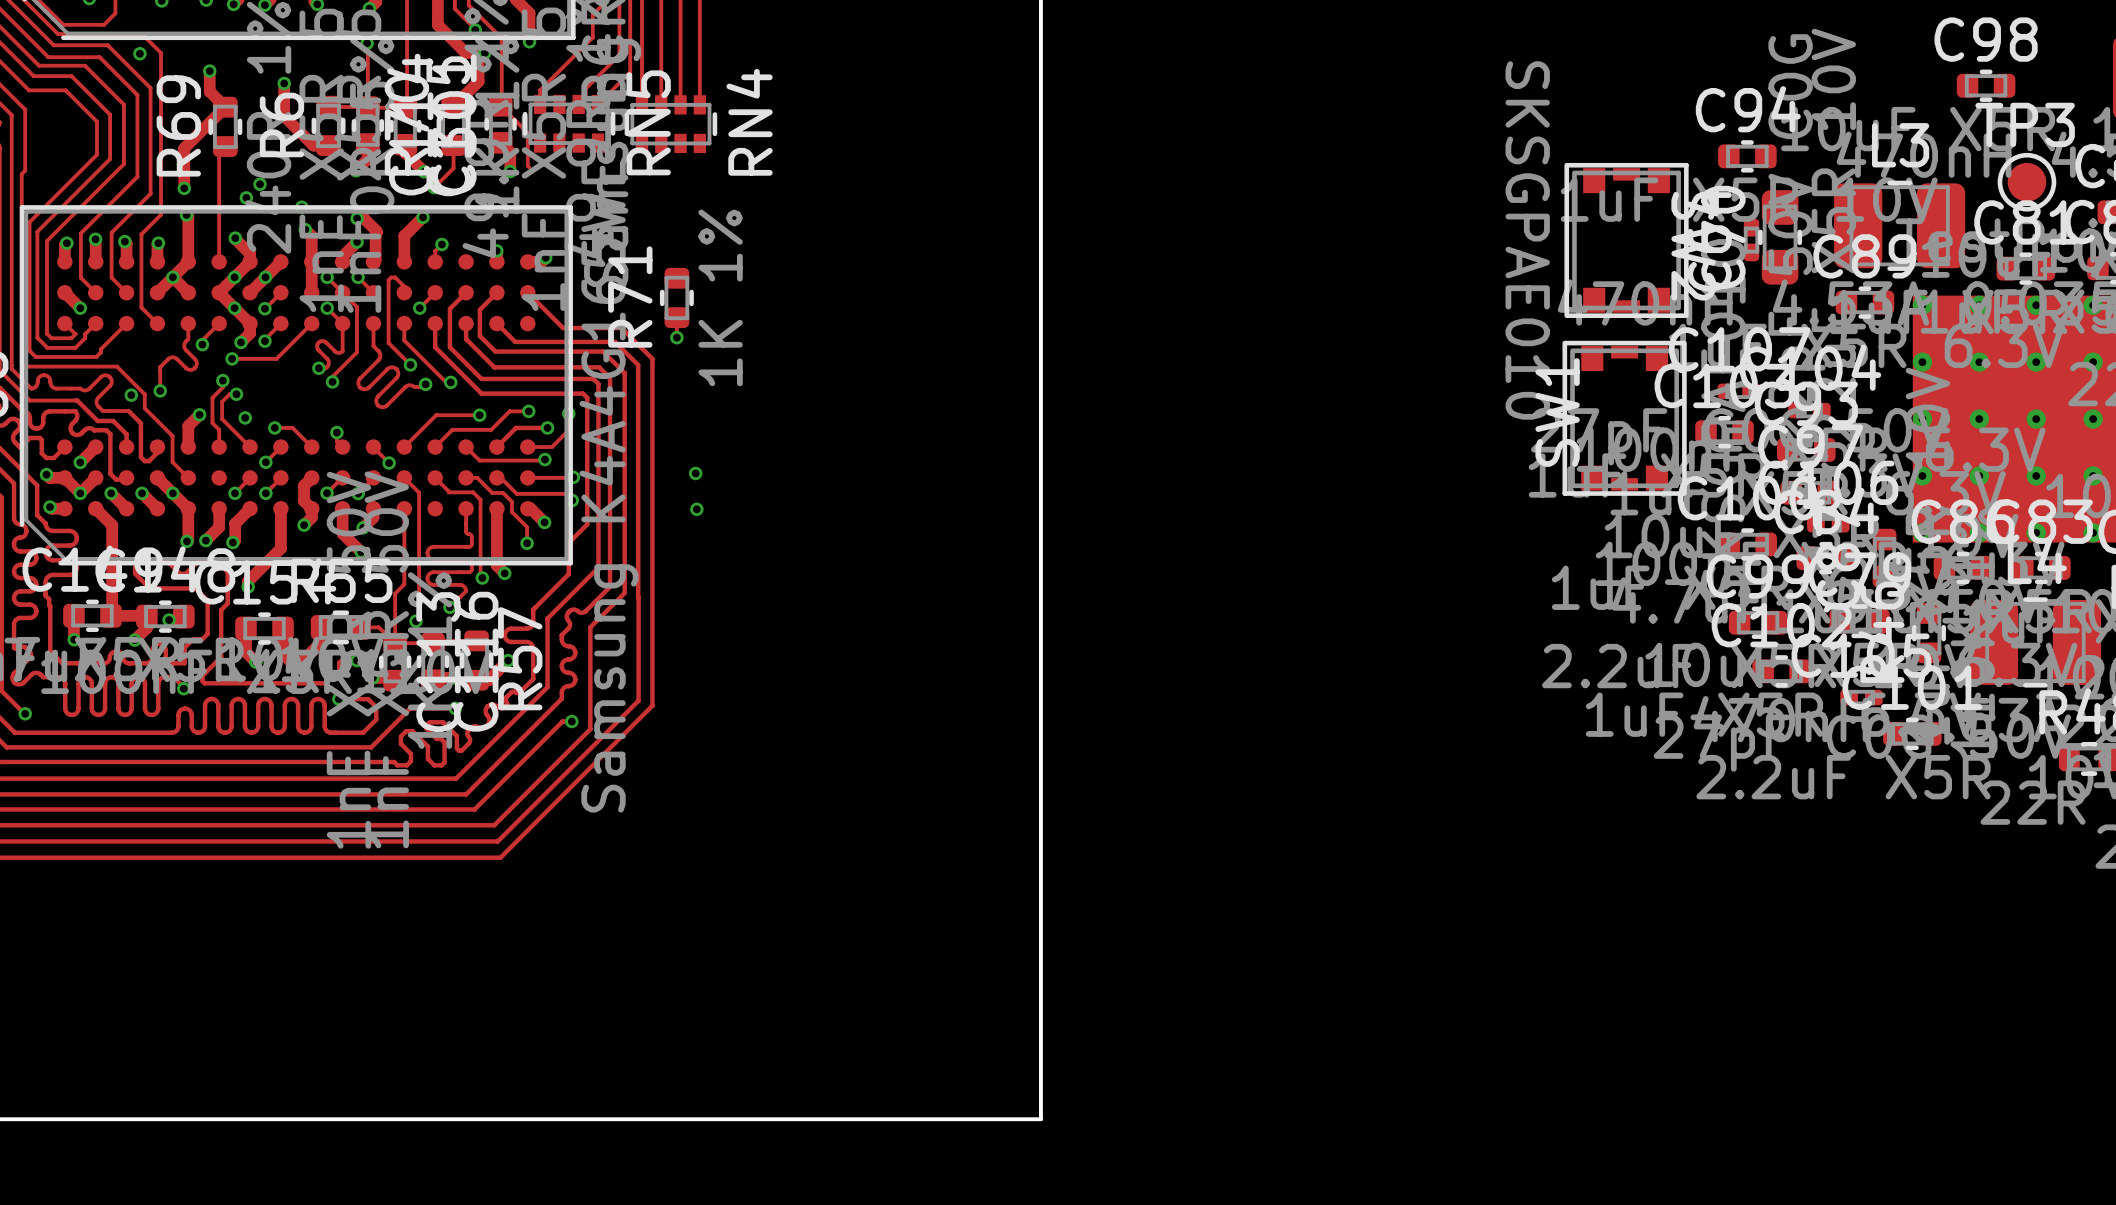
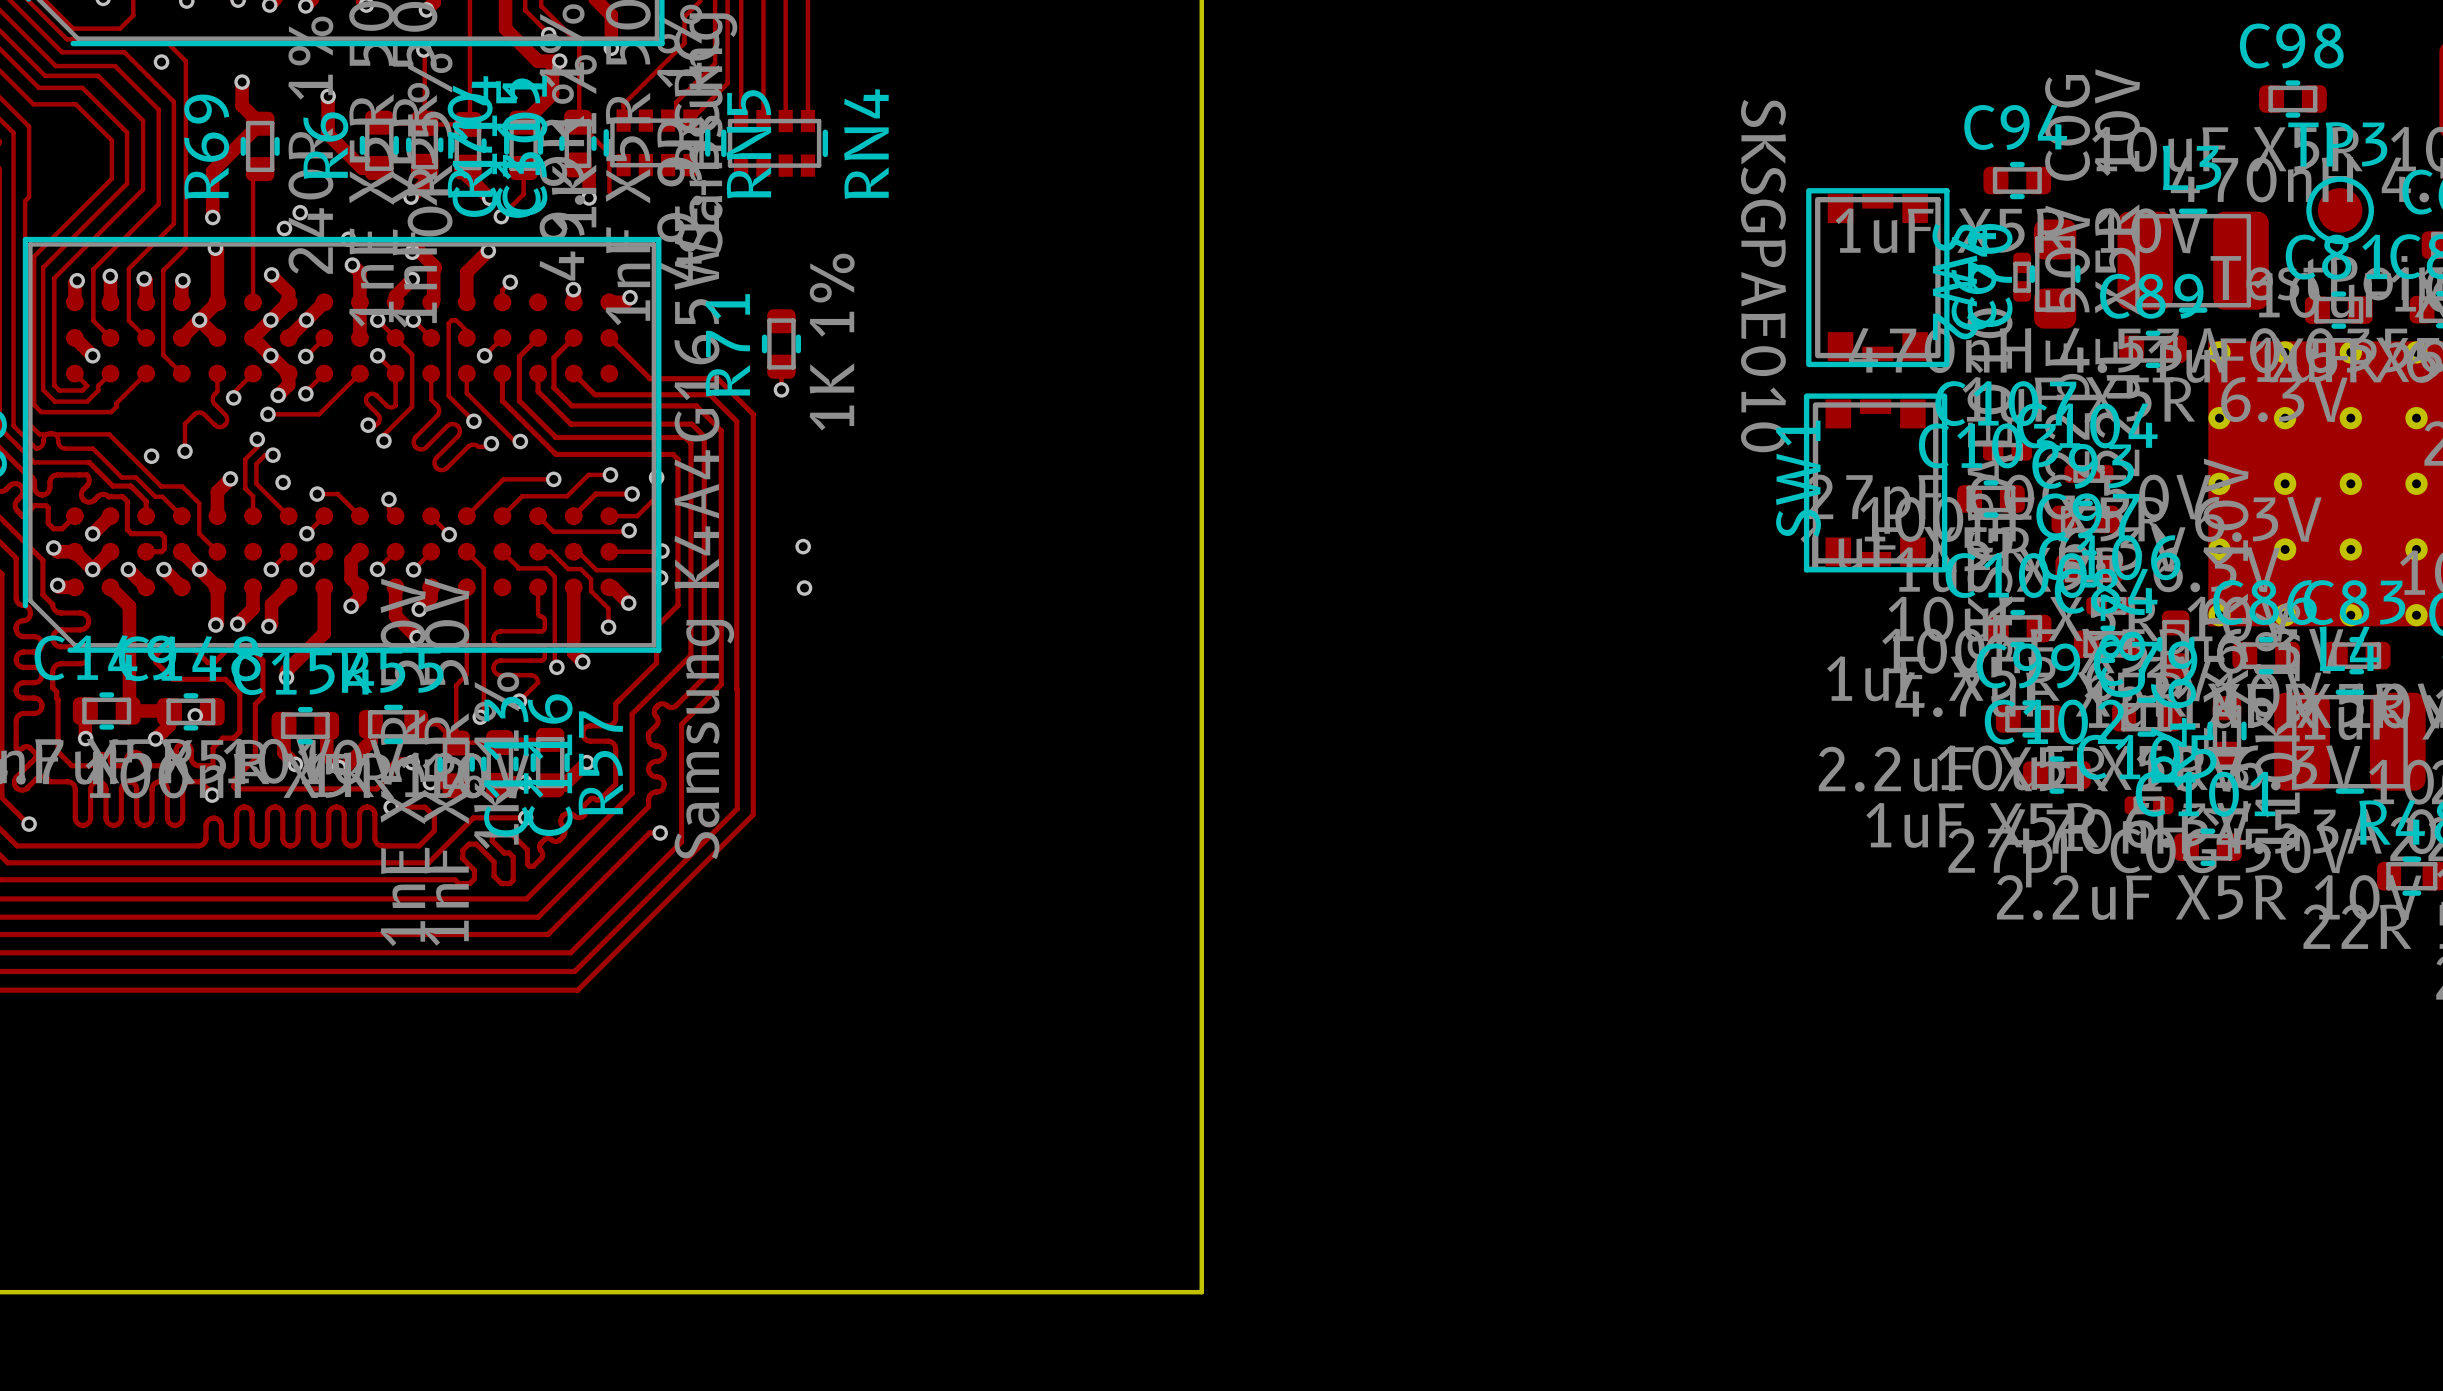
track: (24, 366) (117, 366) (144, 394) (144, 408) (157, 421) -> (28, 423) (39, 434) (109, 434) (161, 486) (182, 486)
track: (80, 388) (88, 389) (103, 375) (109, 377) (111, 383) (97, 398) (98, 406) -> (92, 448) (113, 469)
track: (102, 410) (128, 410) (140, 423) (140, 457) (144, 461) (149, 461) (157, 452) (157, 447) -> (118, 474) (121, 477) (136, 477) (155, 496) (162, 496) (181, 516)
track: (110, 458) (110, 473) (116, 479) (126, 477) -> (127, 529) (131, 533) (160, 533) (164, 537) (164, 548) (161, 551) (146, 551)

